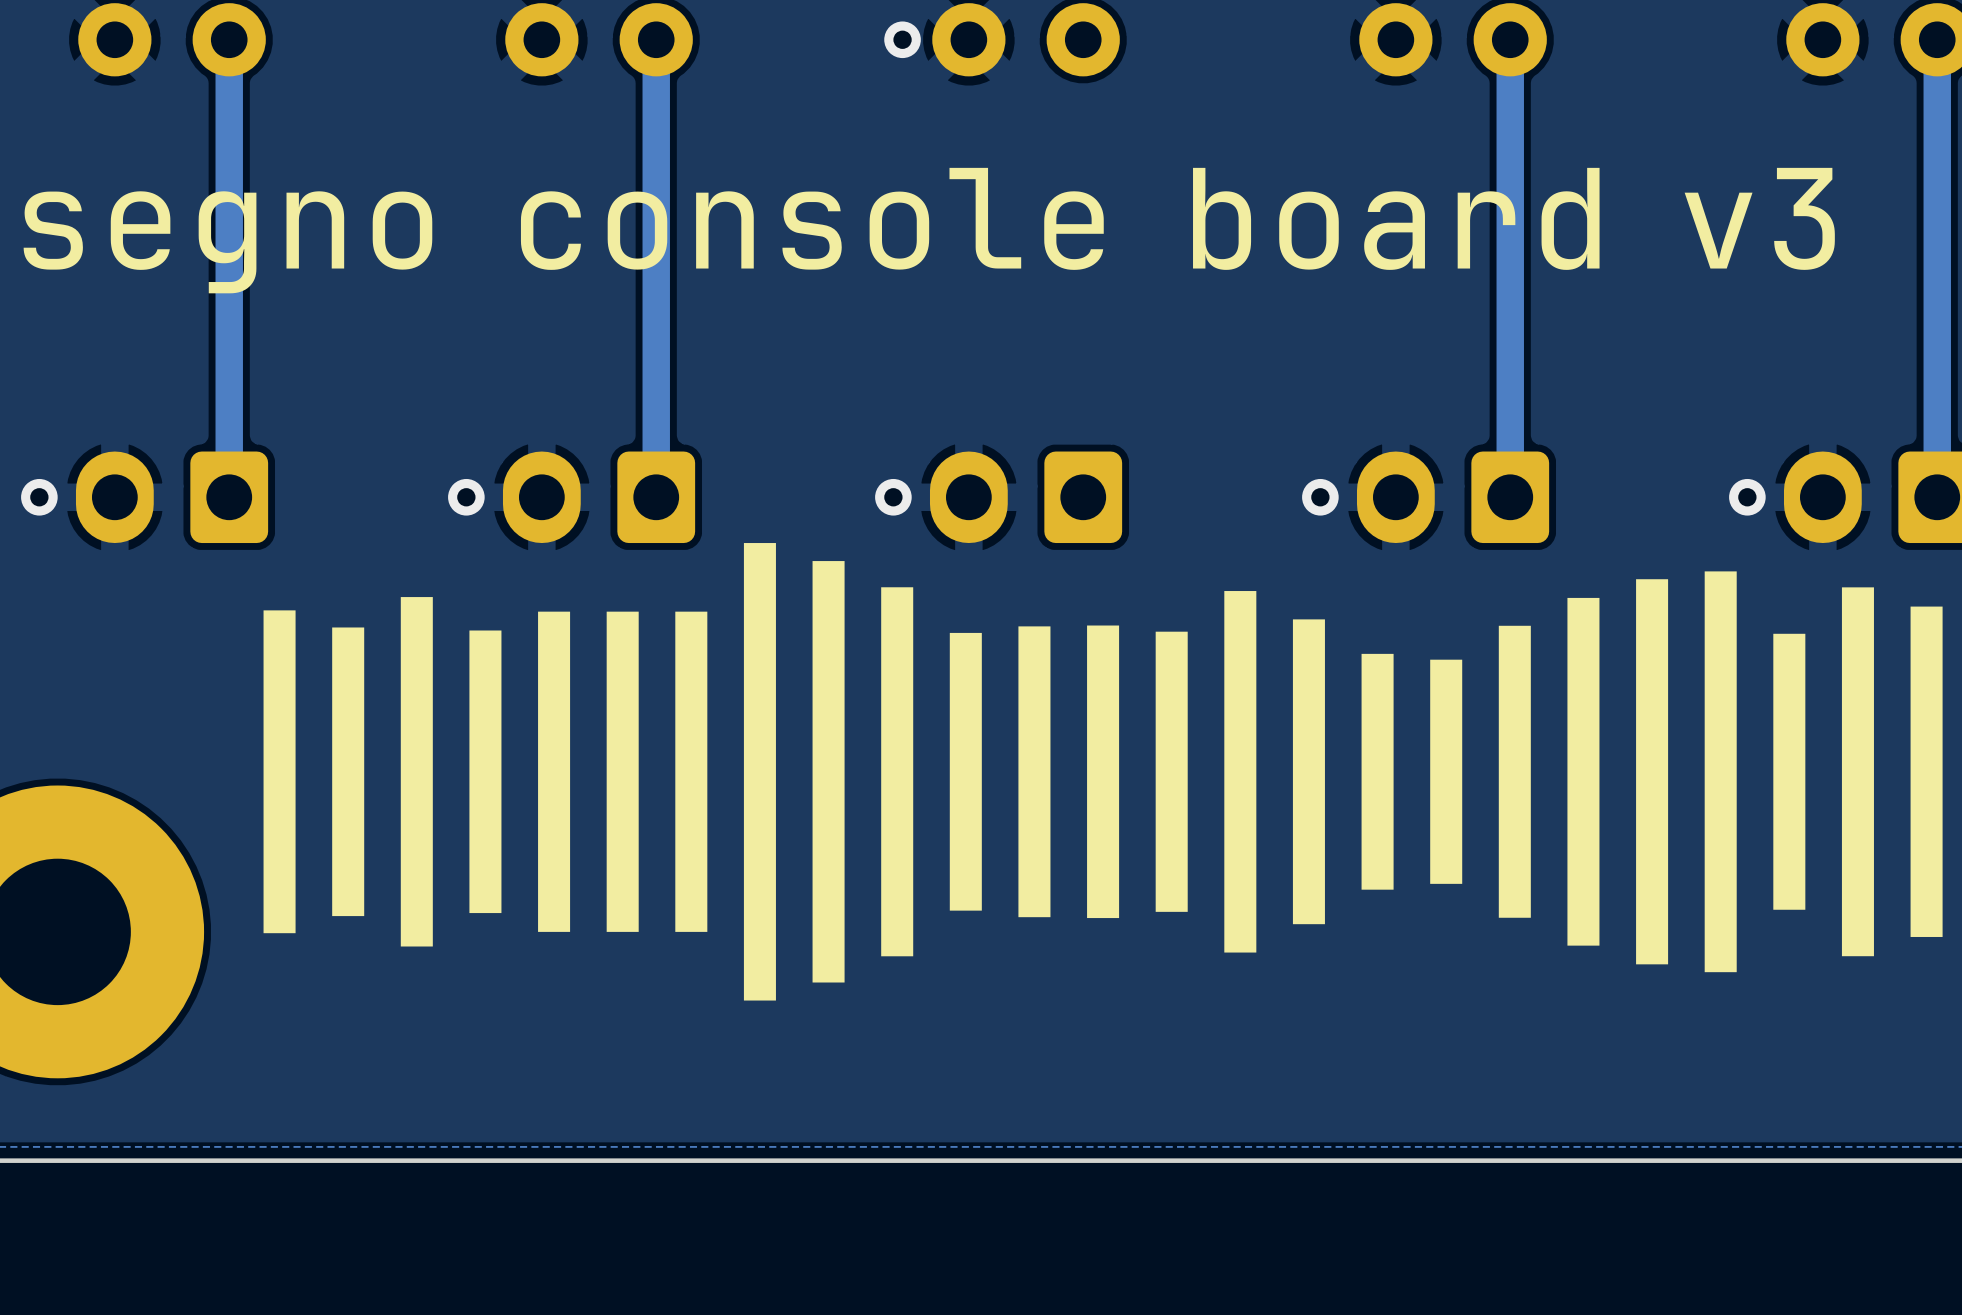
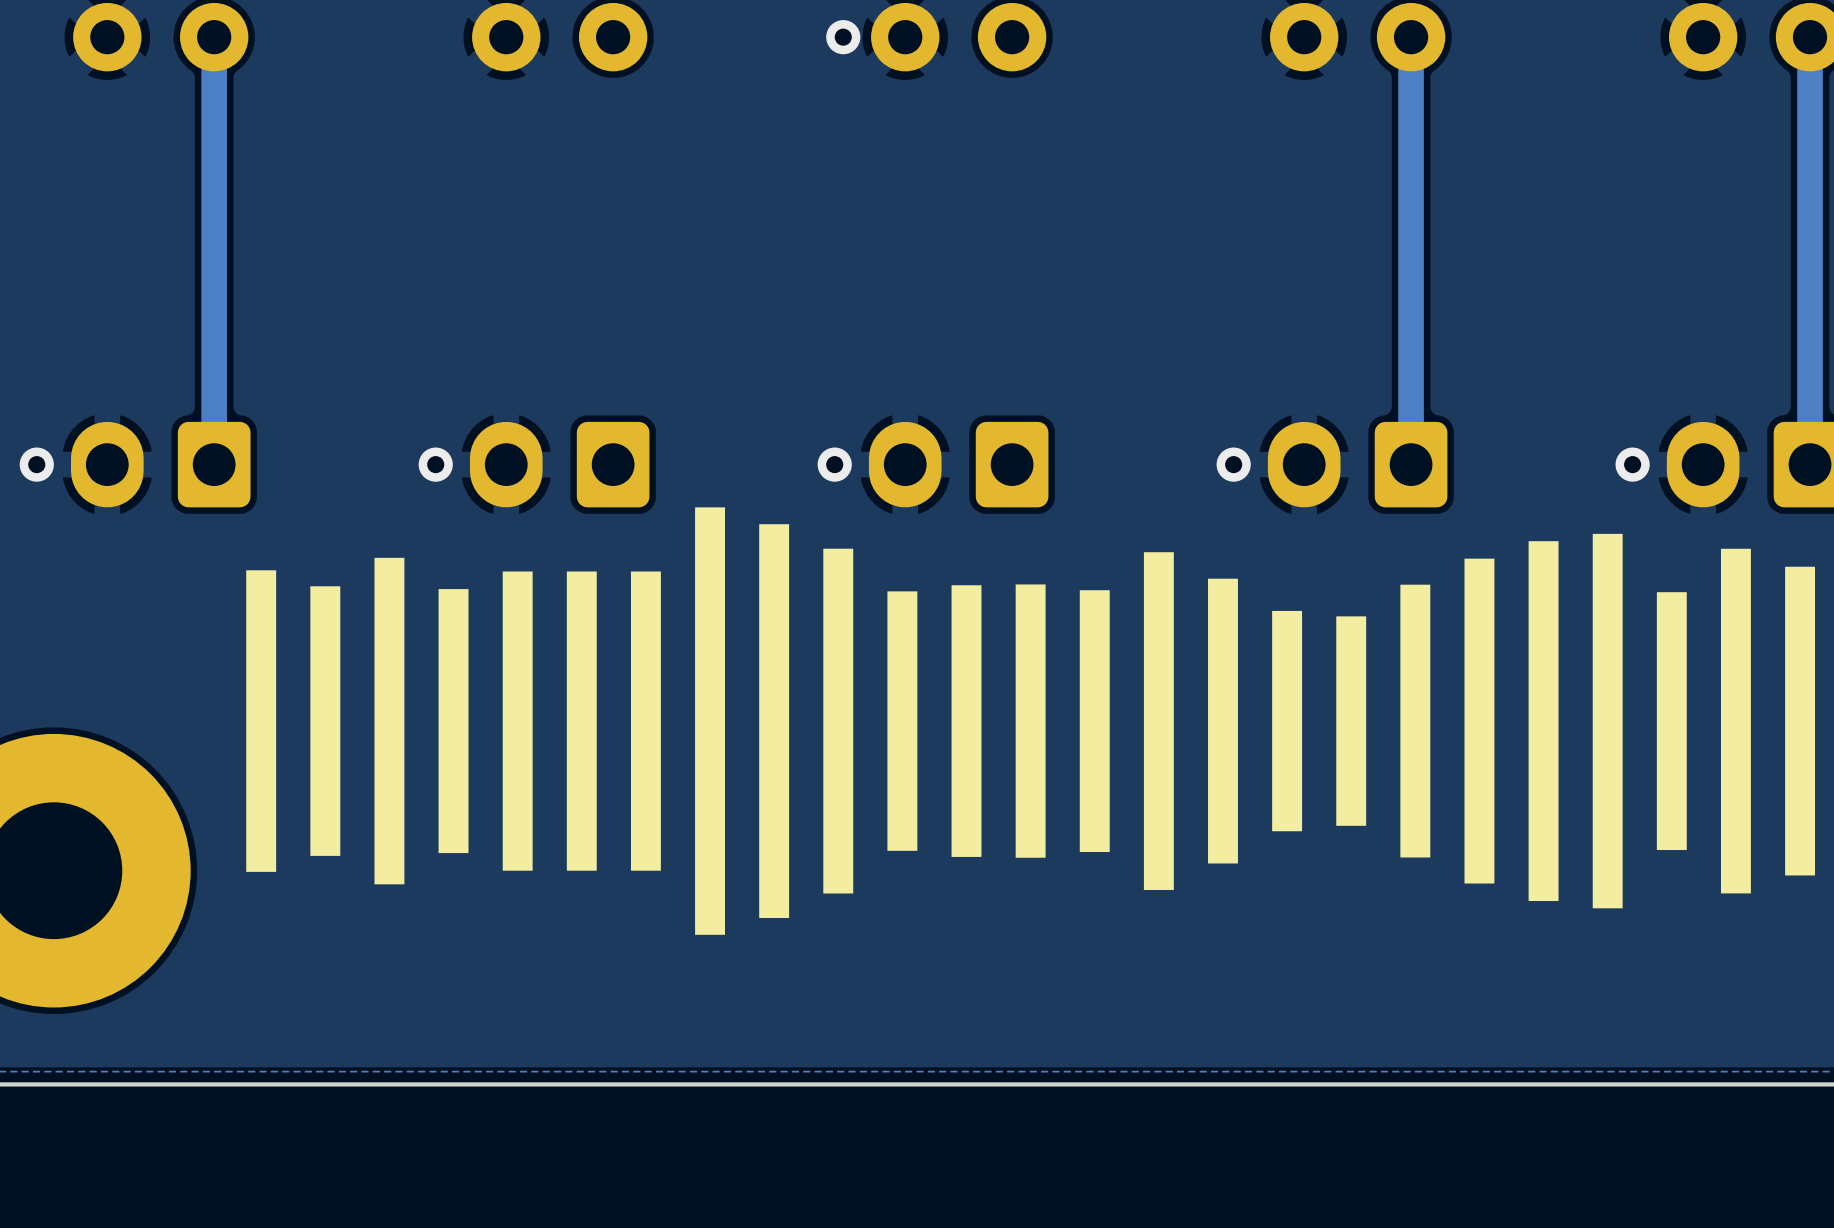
track: (656, 39) (656, 497) -> none
drawing: [520, 167, 1104, 270] -> none
drawing: [1193, 167, 1600, 270] -> none
drawing: [1684, 167, 1835, 270] -> none
drawing: [23, 191, 433, 294] -> none

